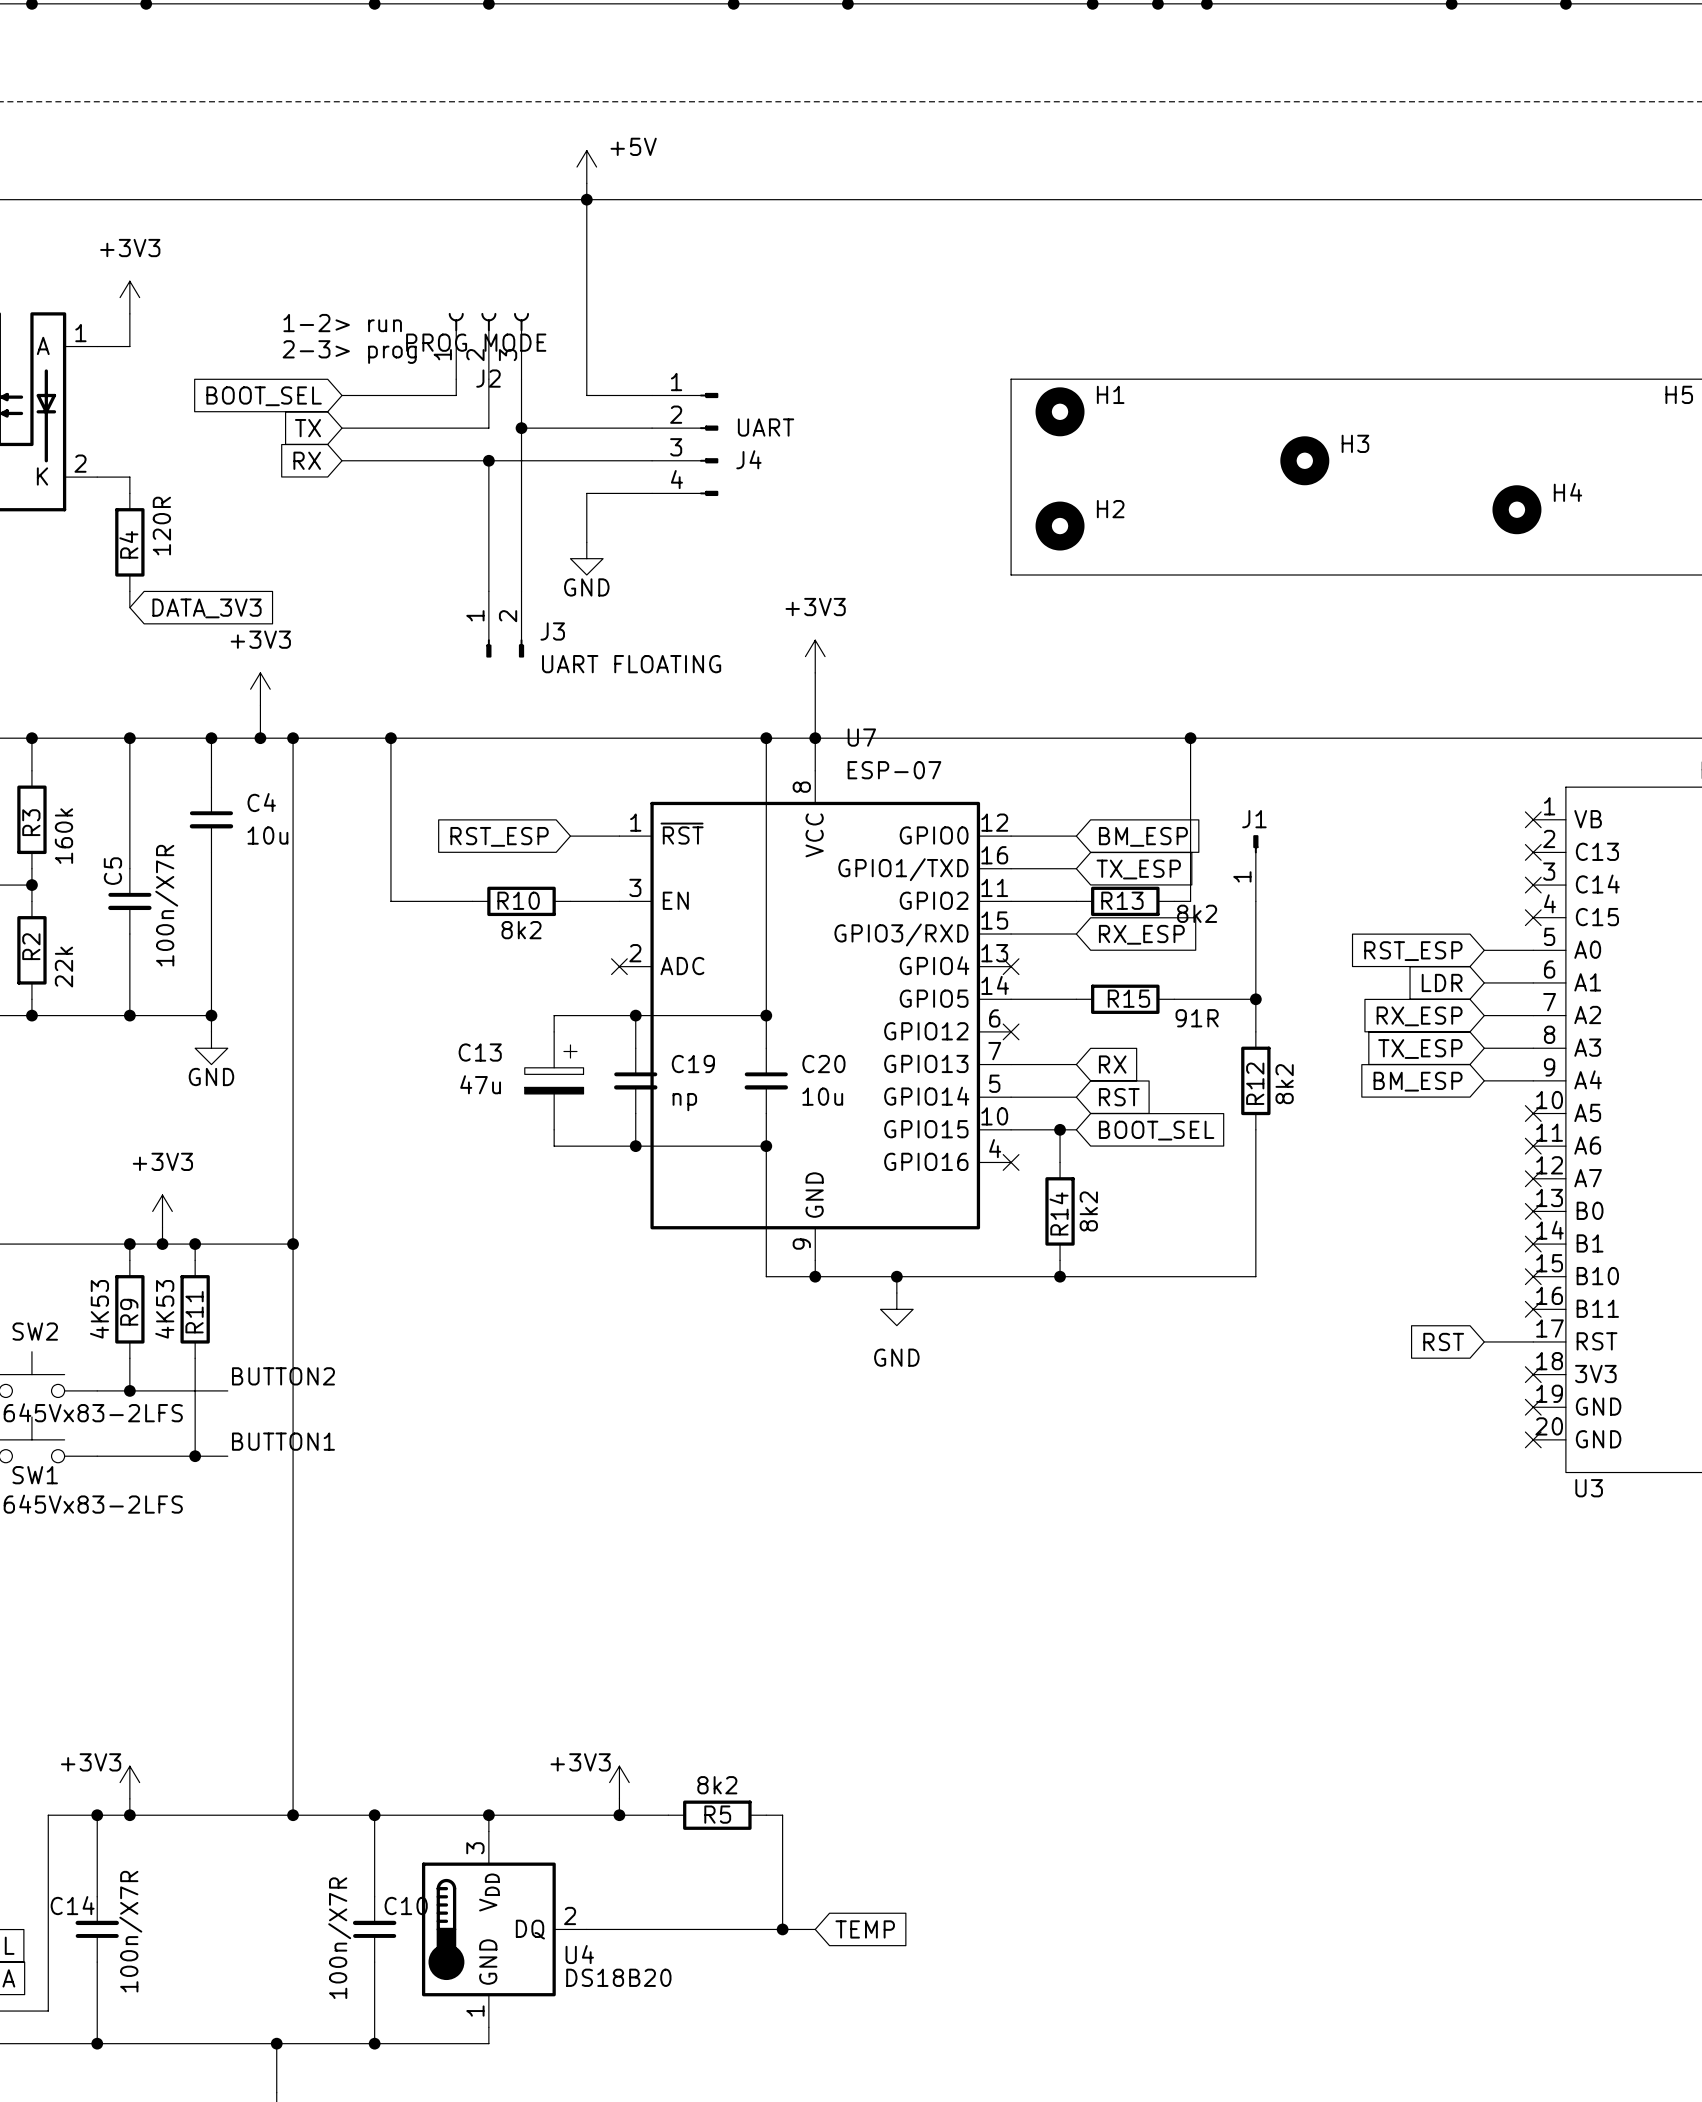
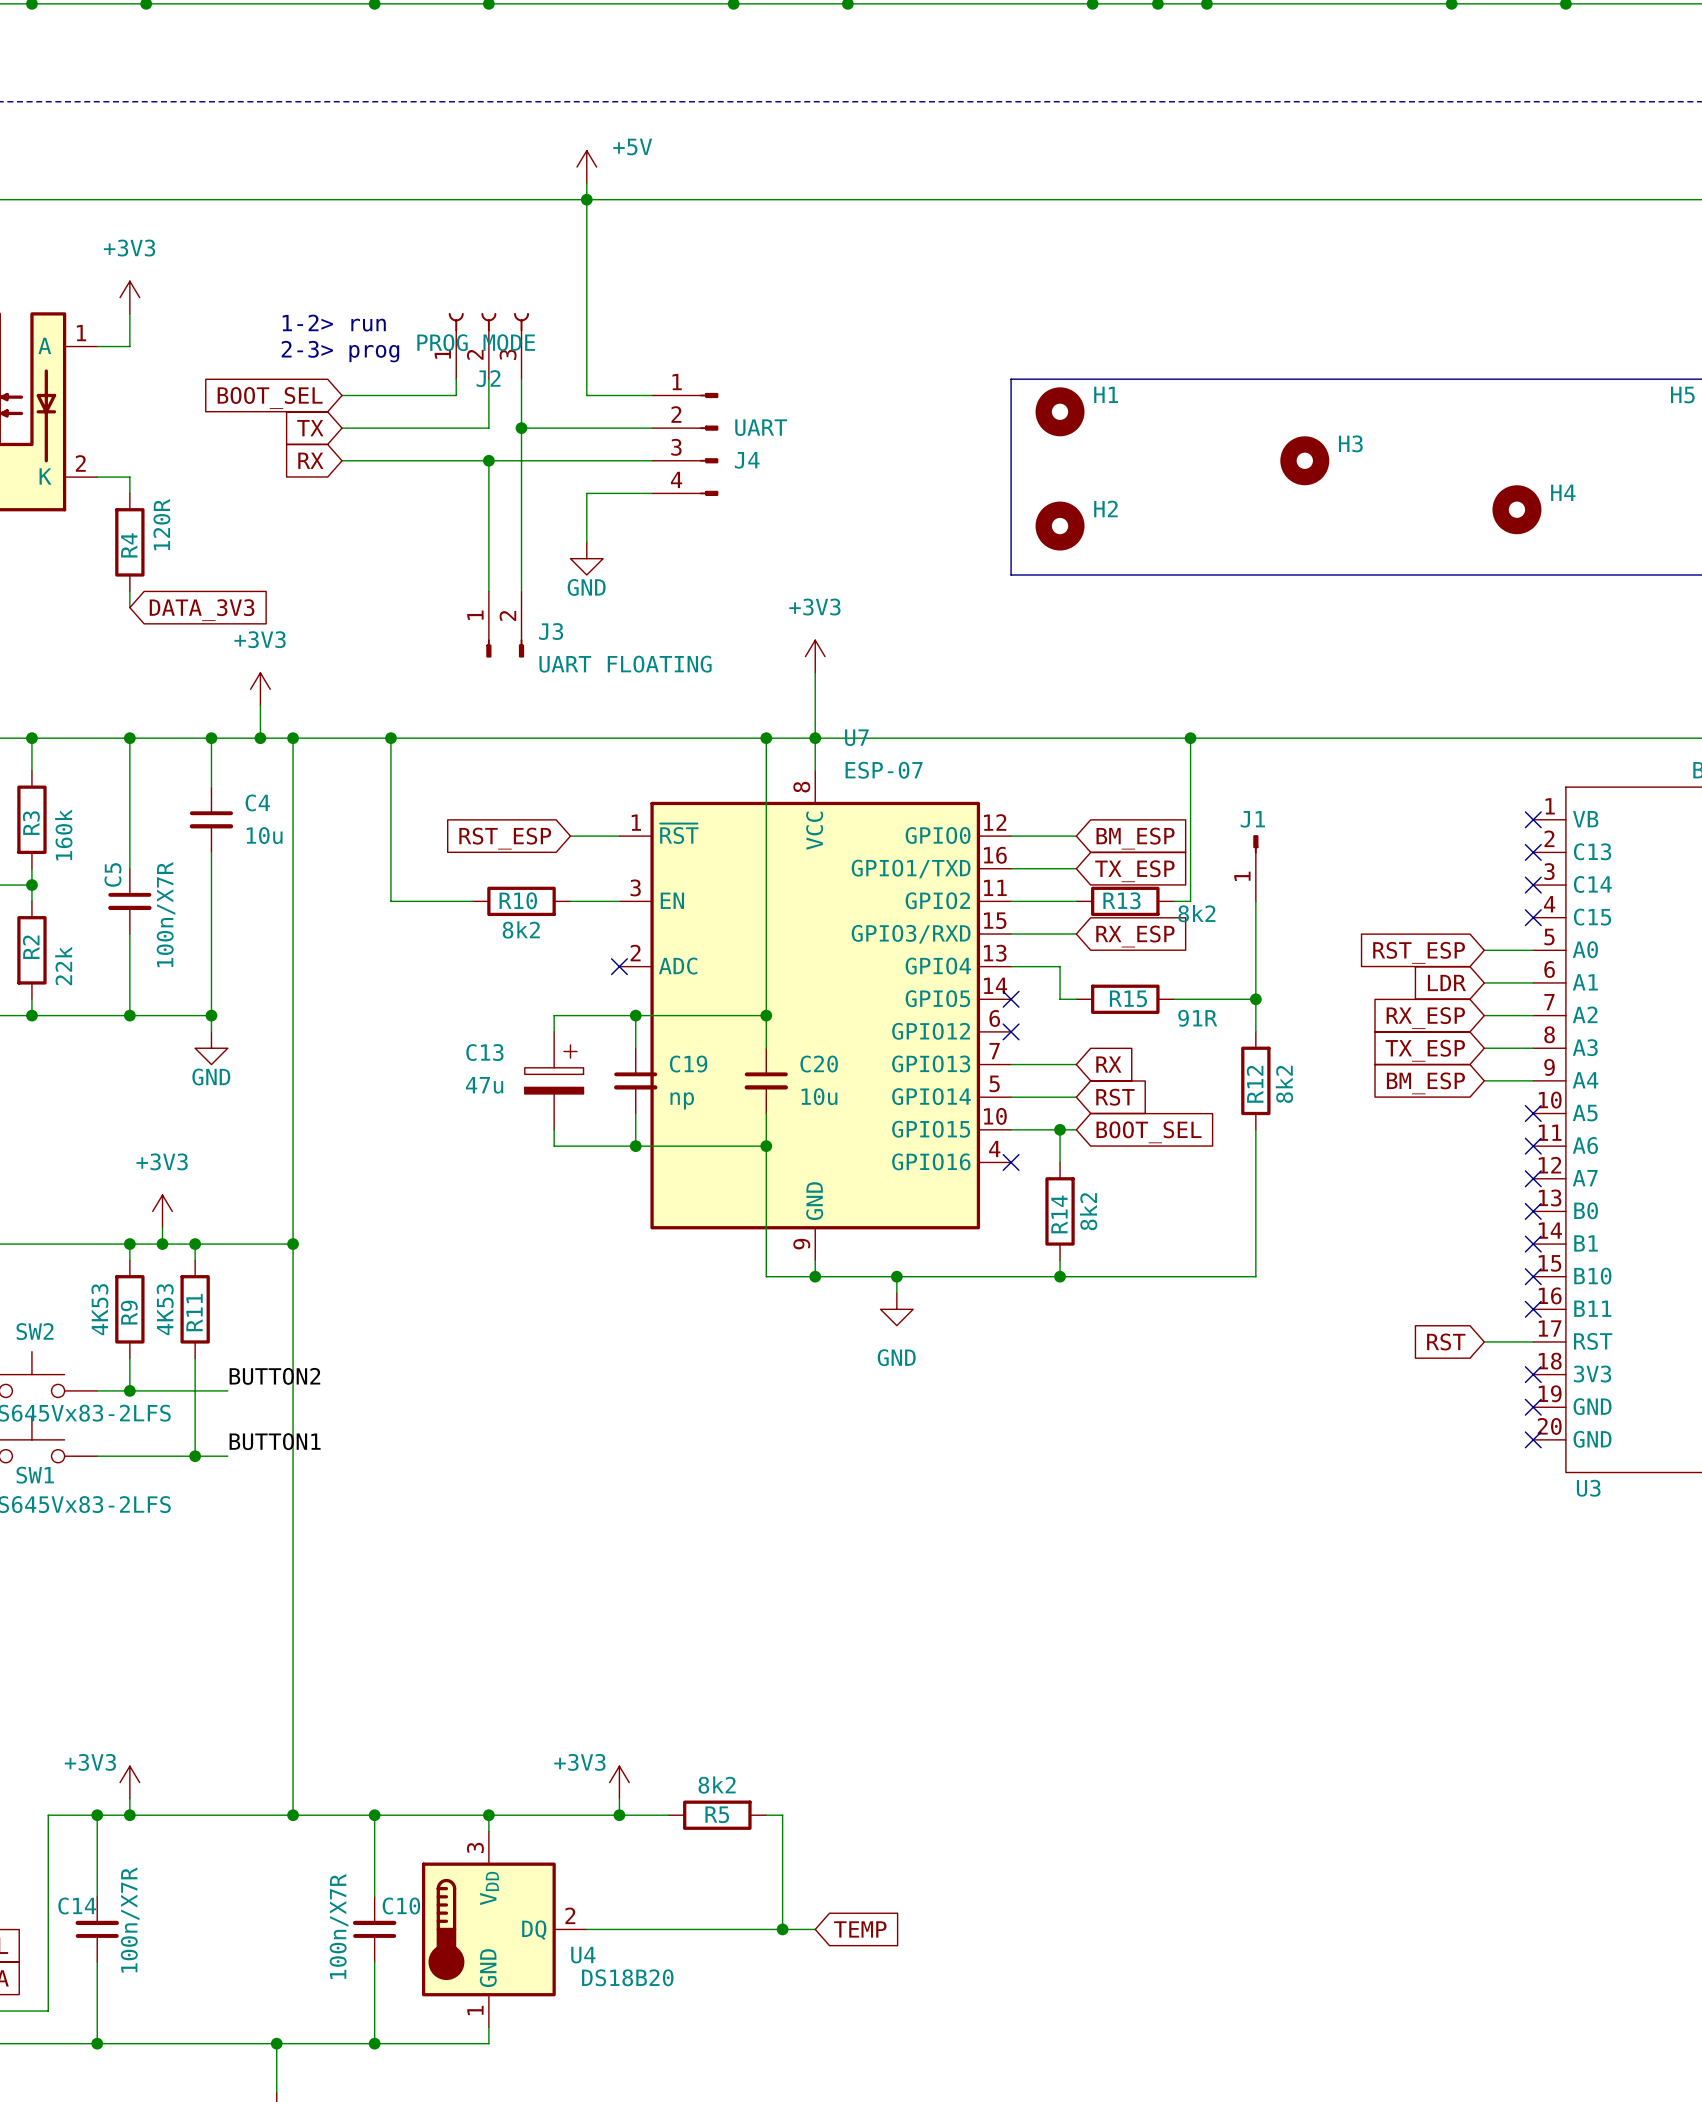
no-connect mark position: (1011, 966) -> (1011, 999)
wire: (1011, 999) (1060, 999) -> (1011, 966) (1060, 966) (1060, 999)

